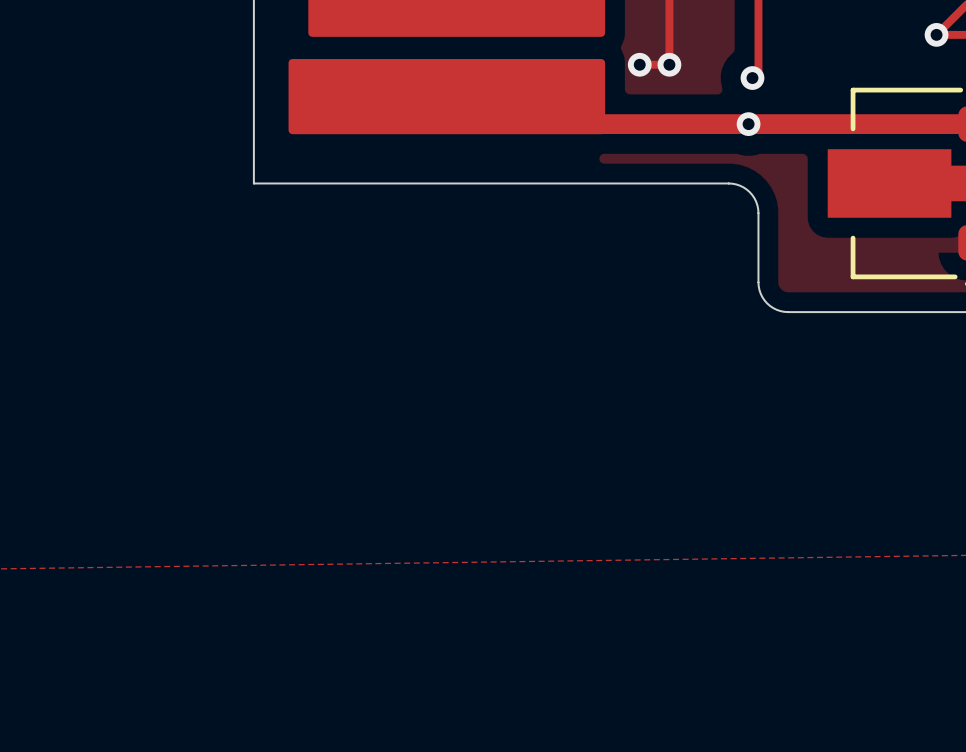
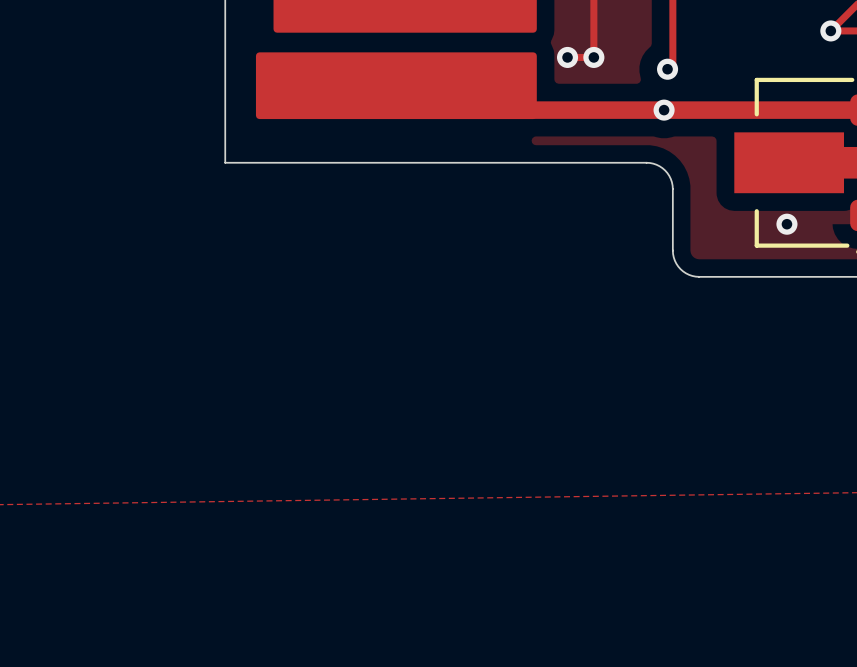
via: none -> (786, 224)

